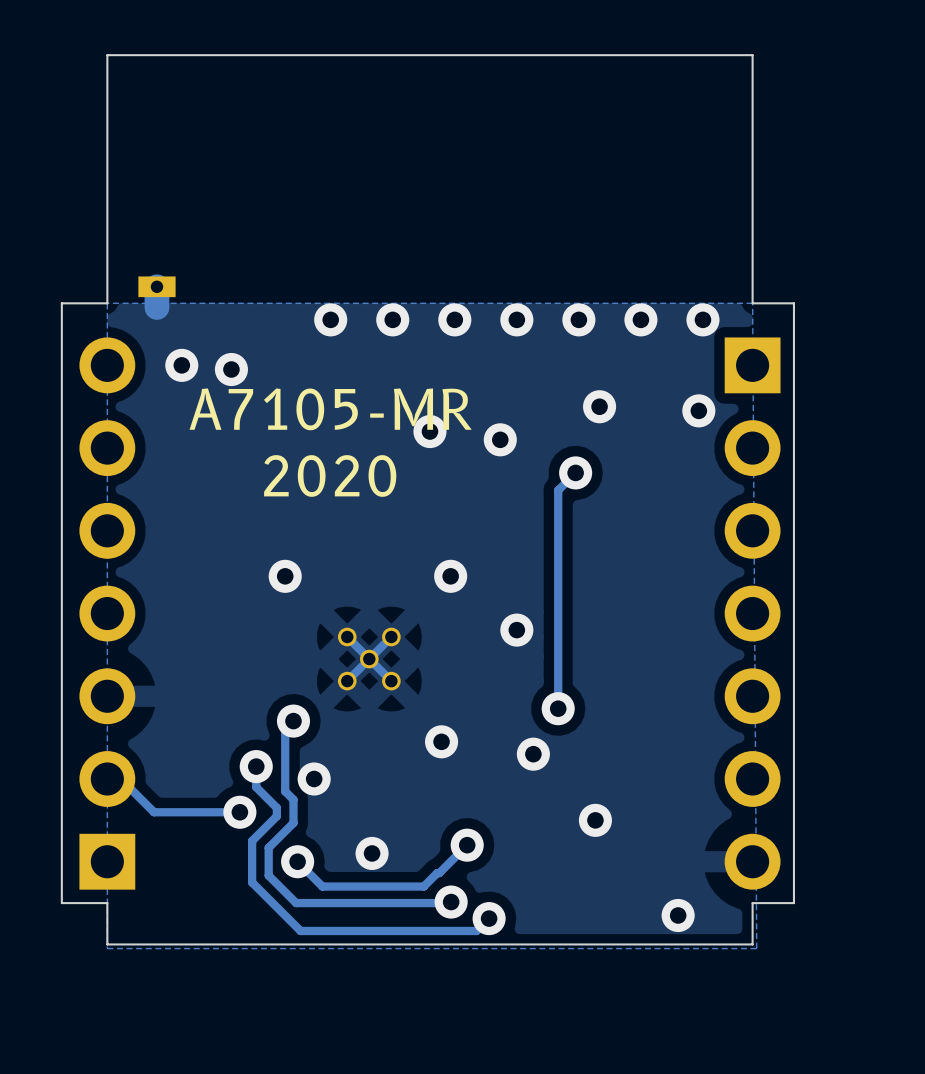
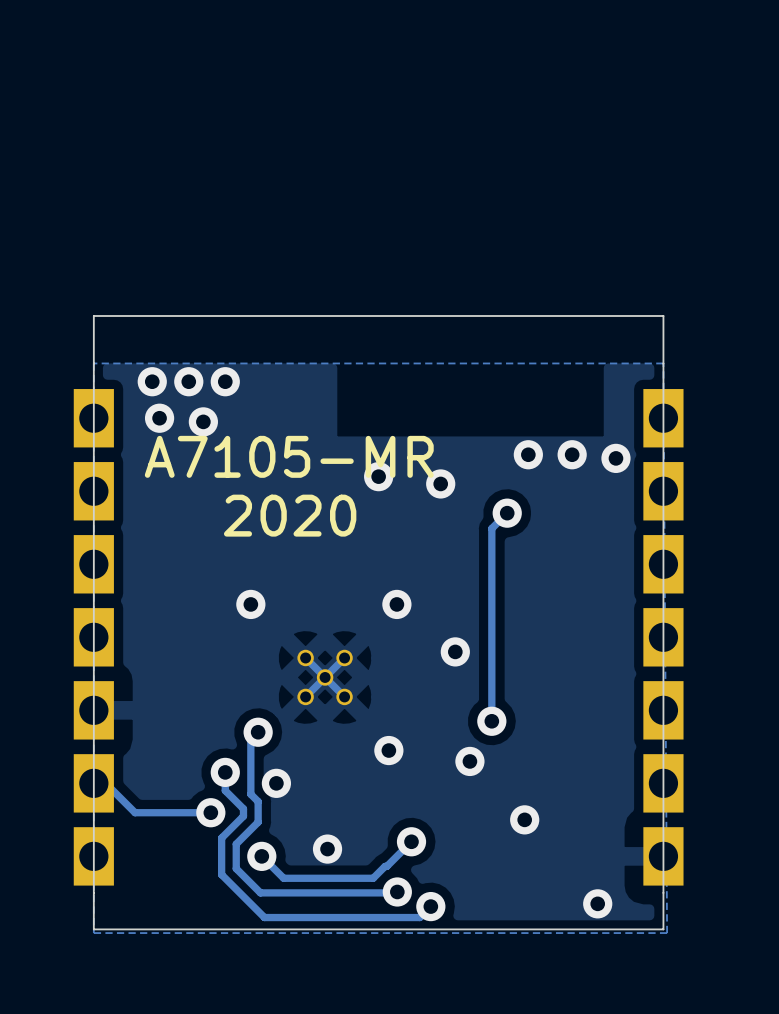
board edge: (752, 249) (752, 55) (107, 55) (107, 249) -> (663, 315) (93, 315)
track: (156, 286) (156, 307) -> none
part: (156, 286) -> none
board edge: (107, 303) (61, 303) (61, 903) (107, 903) -> (93, 363) (93, 892)
board edge: (752, 303) (793, 303) (793, 903) (752, 903) -> (663, 363) (663, 892)
via: (330, 319) -> none
via: (392, 319) -> none
via: (454, 319) -> none
via: (516, 319) -> none
via: (578, 319) -> none
via: (640, 319) -> none
via: (702, 319) -> none
via: none -> (152, 381)
via: none -> (188, 381)
via: none -> (225, 381)
part footprint: [79, 337, 136, 890] -> [73, 389, 114, 886]
part footprint: [724, 337, 781, 890] -> [643, 389, 684, 886]
via: none -> (572, 454)

